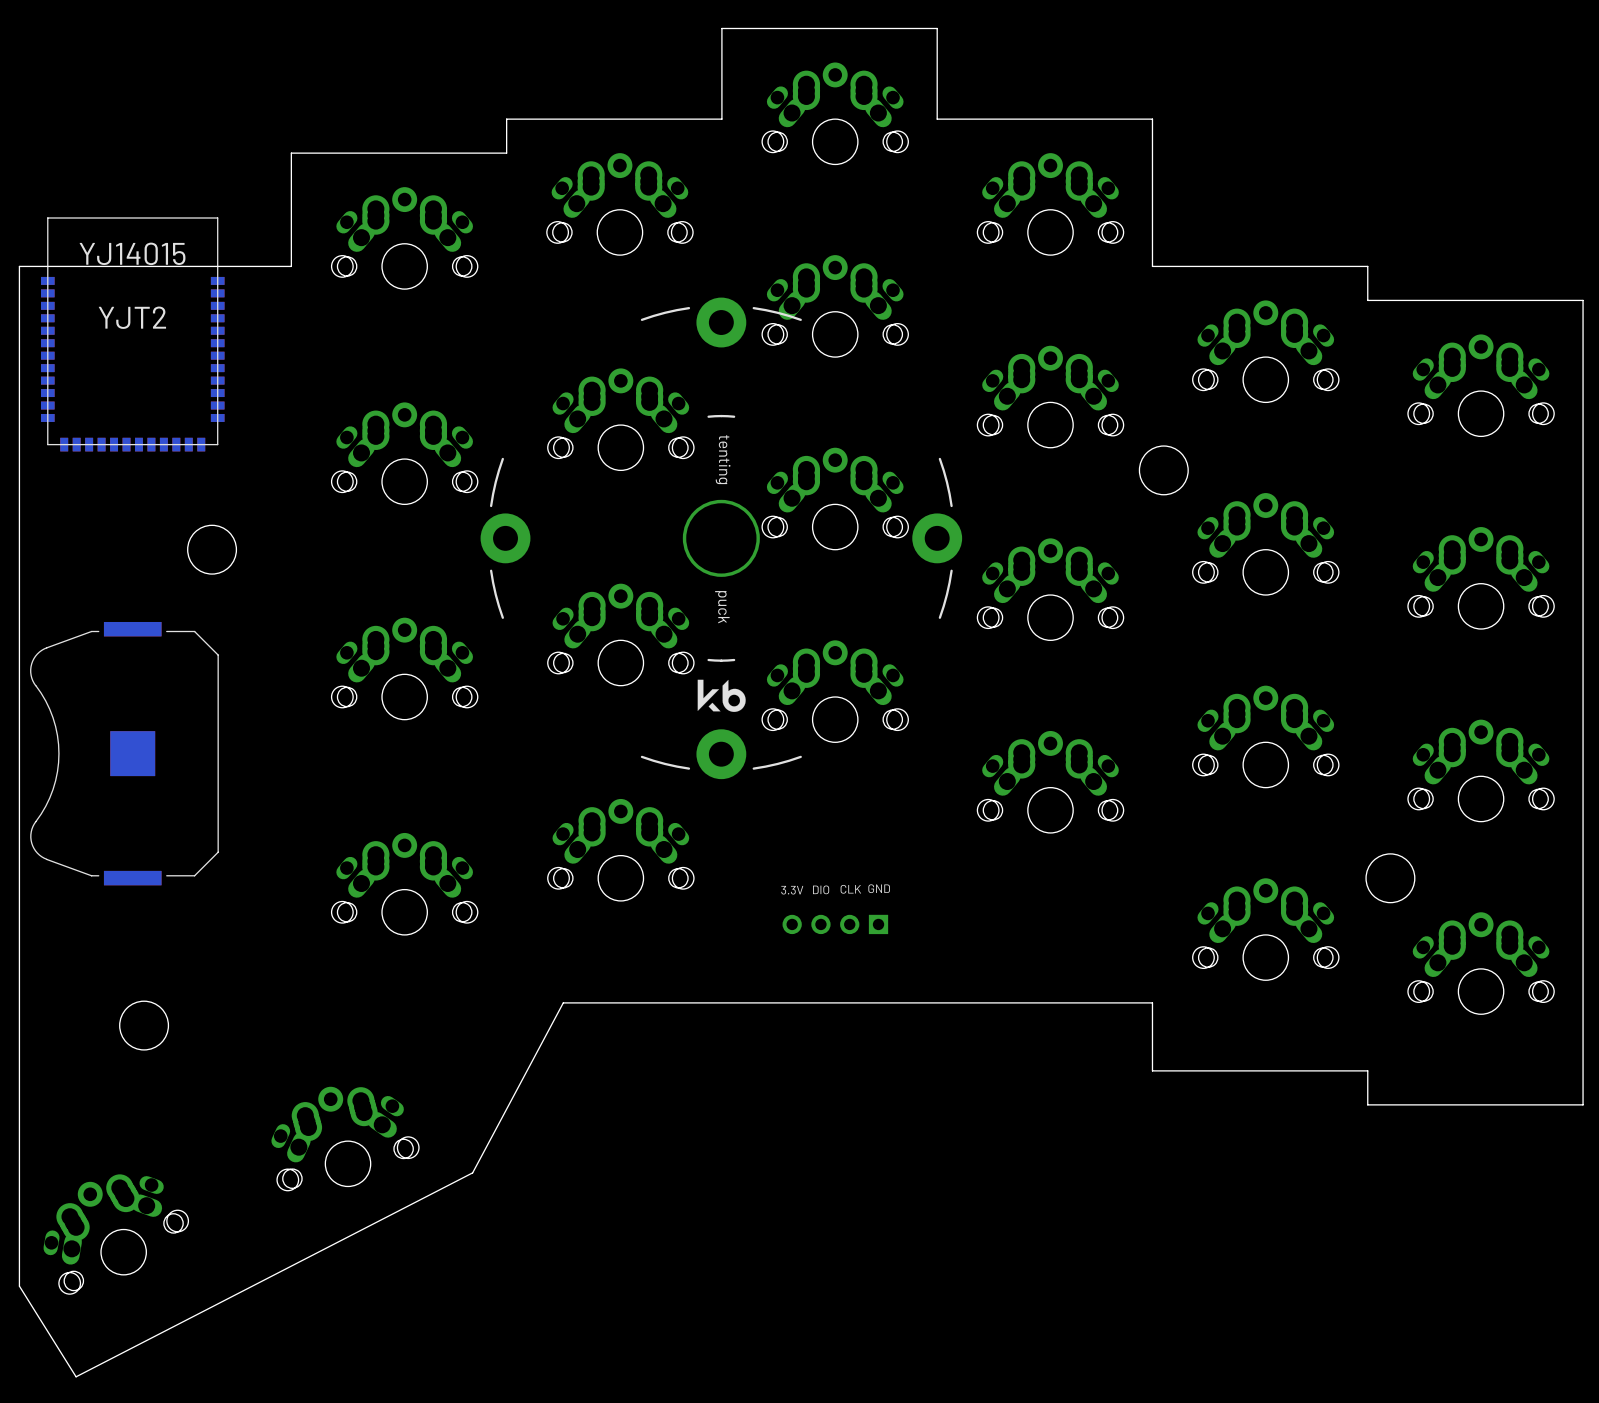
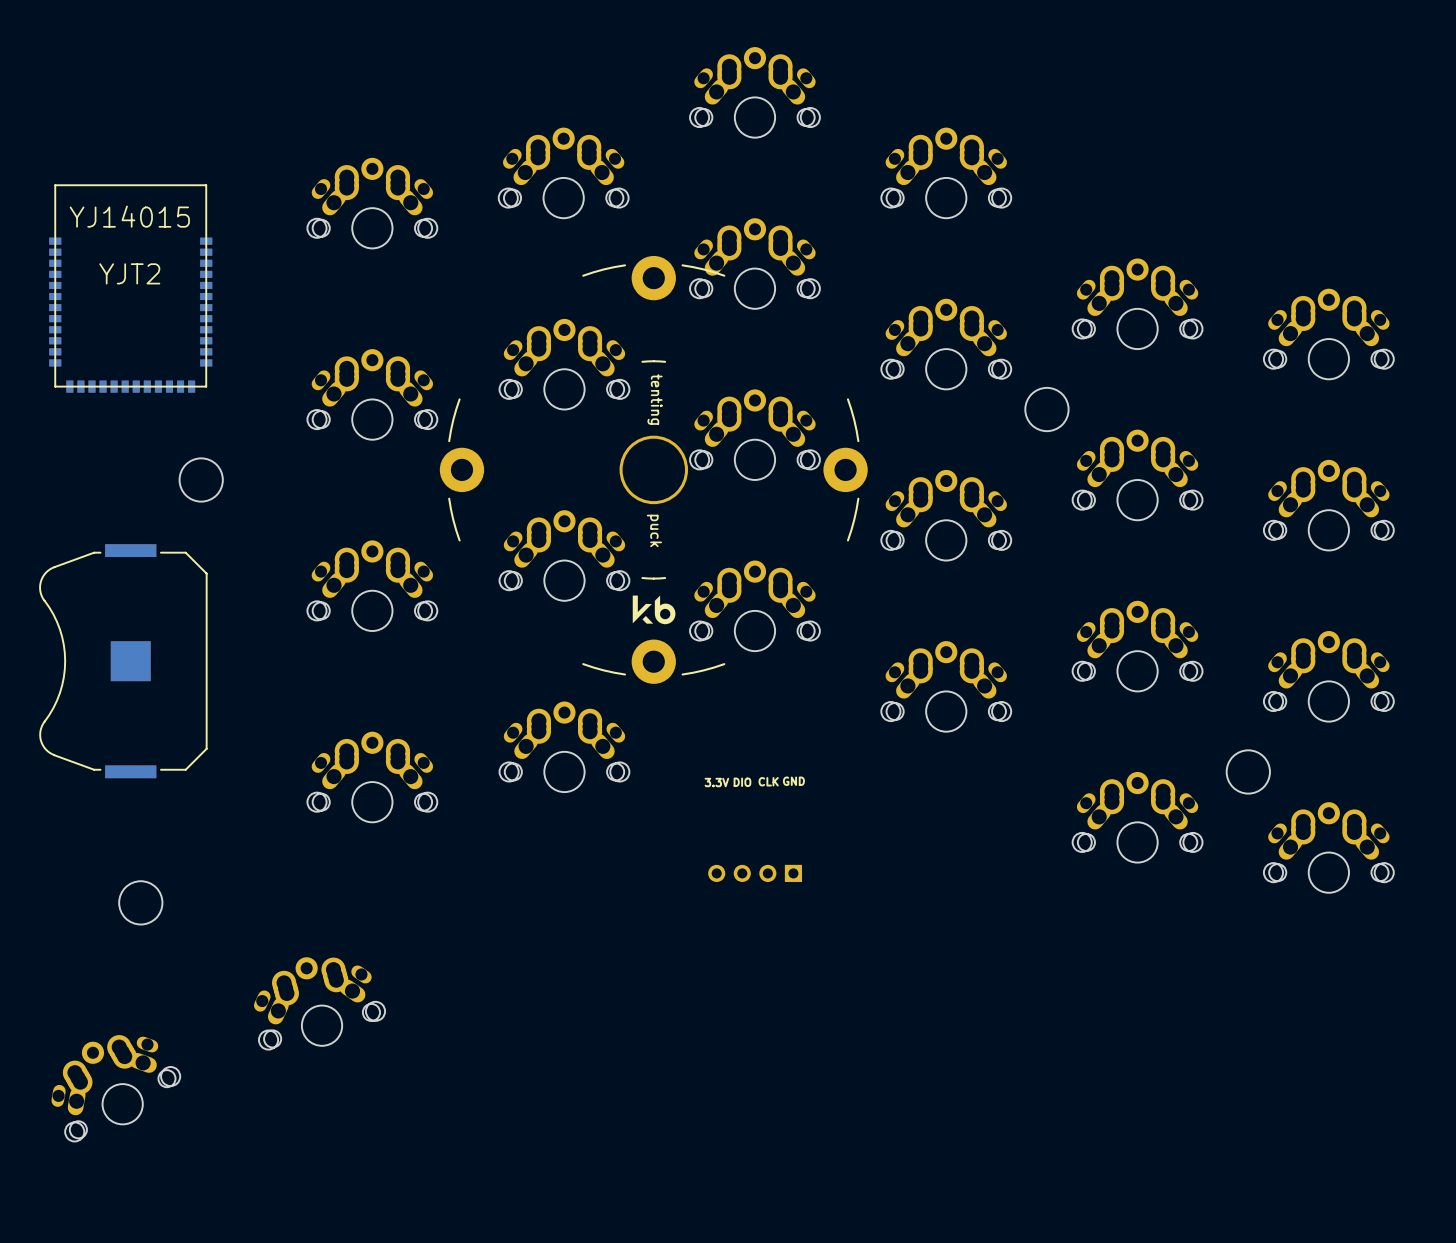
board edge: (937, 28) (937, 119) (1152, 119) (1152, 266) (1367, 266) (1367, 300) (1583, 300) (1583, 1104) (1367, 1104) (1367, 1070) (1152, 1070) (1152, 1002) (563, 1002) (472, 1172) (76, 1376) (19, 1286) (19, 266) (291, 266) (291, 153) (506, 153) (506, 119) (721, 119) (721, 28) (937, 28) -> none
part position: (835, 924) -> (755, 873)

